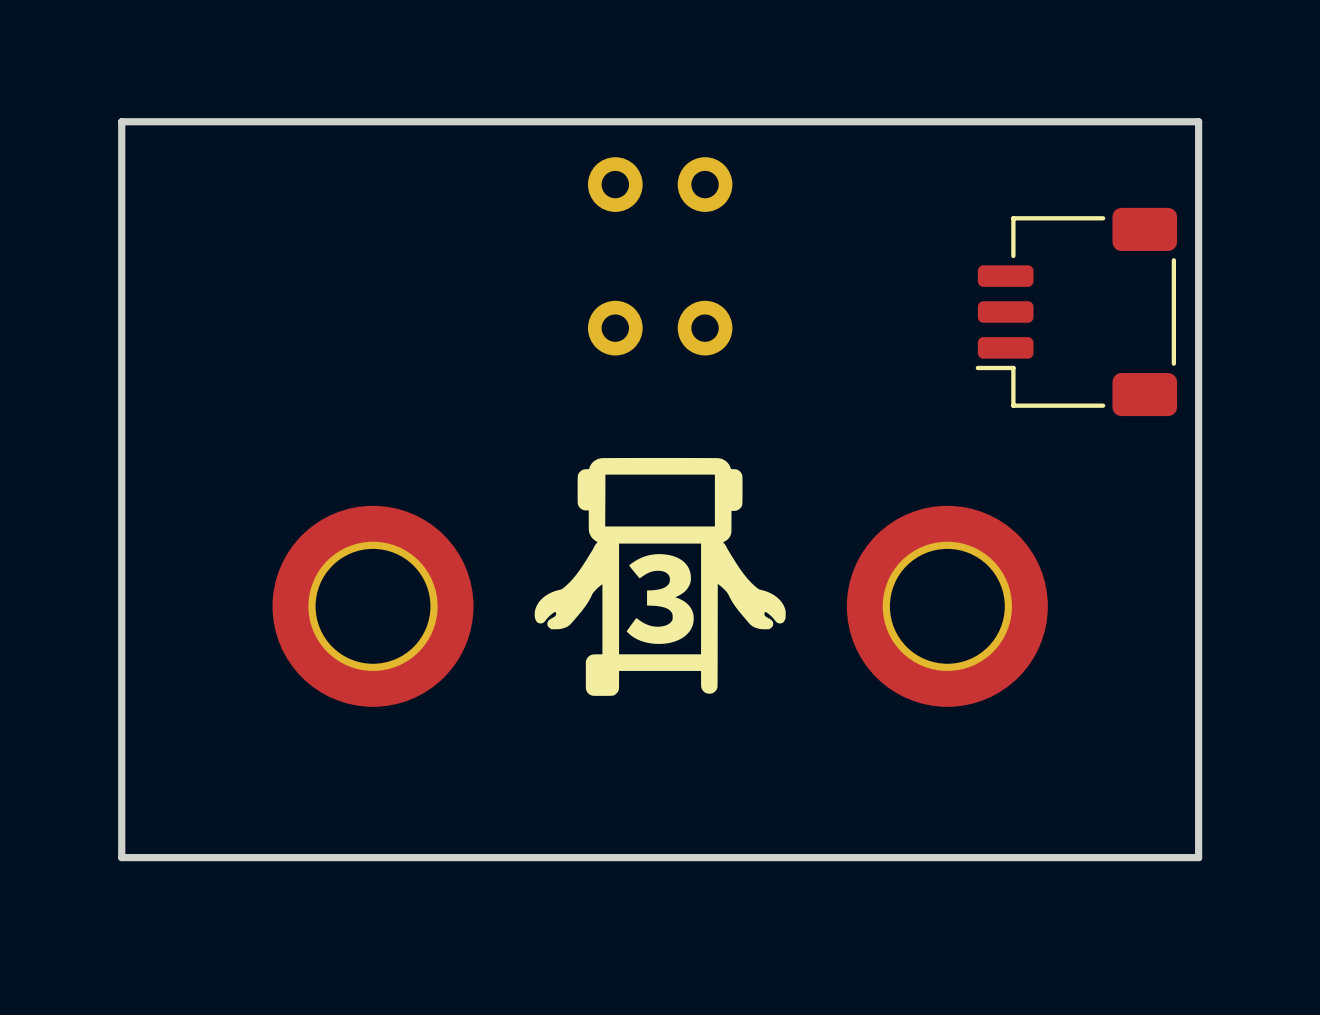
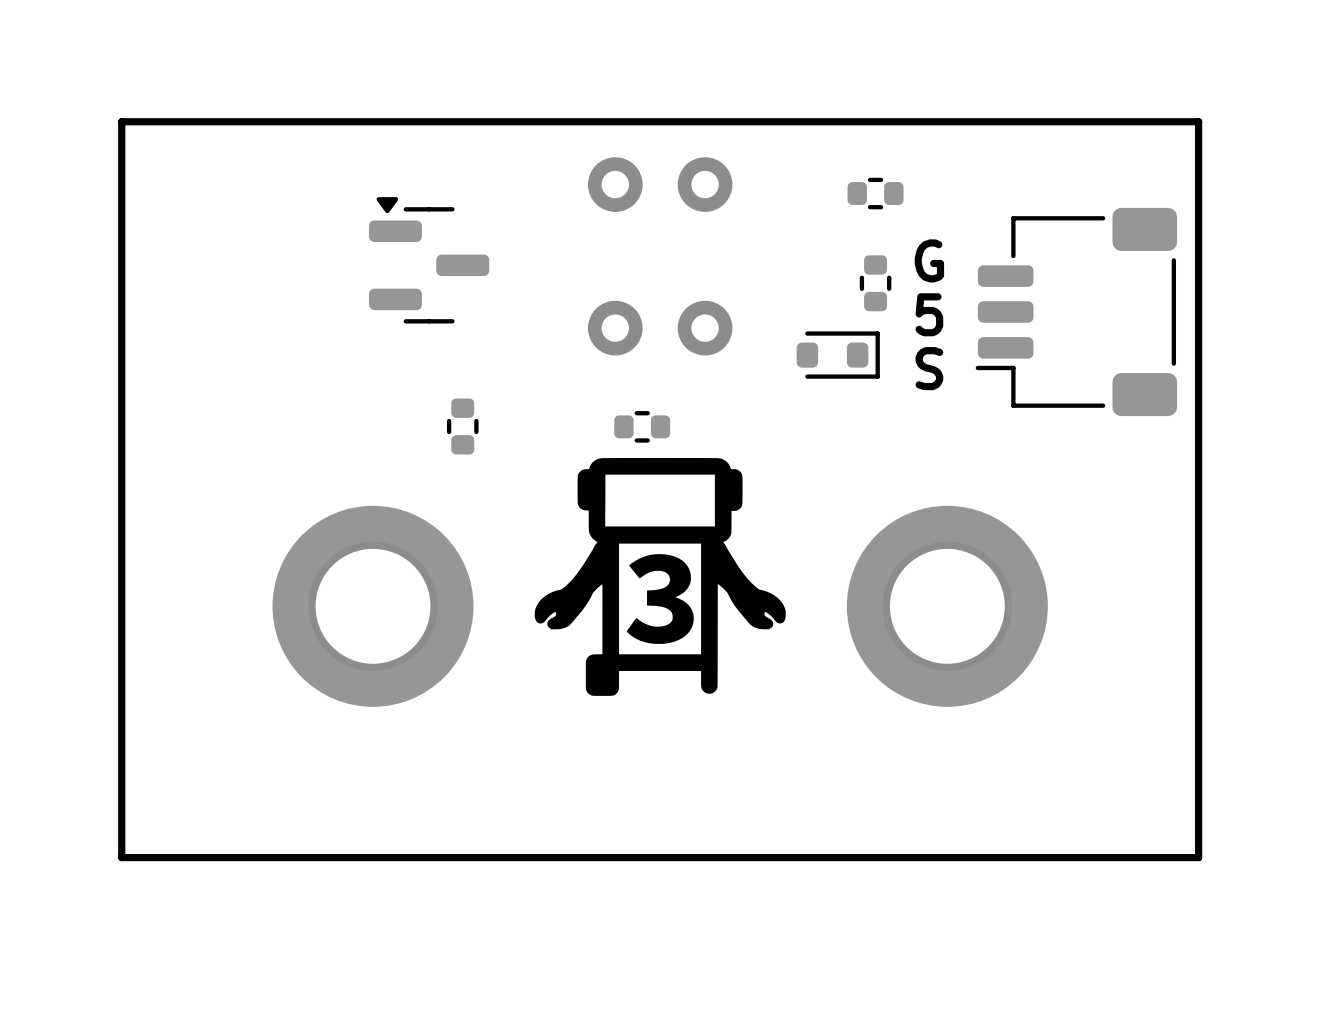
part: none -> (875, 193)
part: none -> (429, 260)
text: none -> G (929, 260)
part: none -> (875, 283)
text: none -> 5 (929, 314)
part: none -> (838, 355)
text: none -> S (929, 368)
part: none -> (462, 426)
part: none -> (642, 426)

